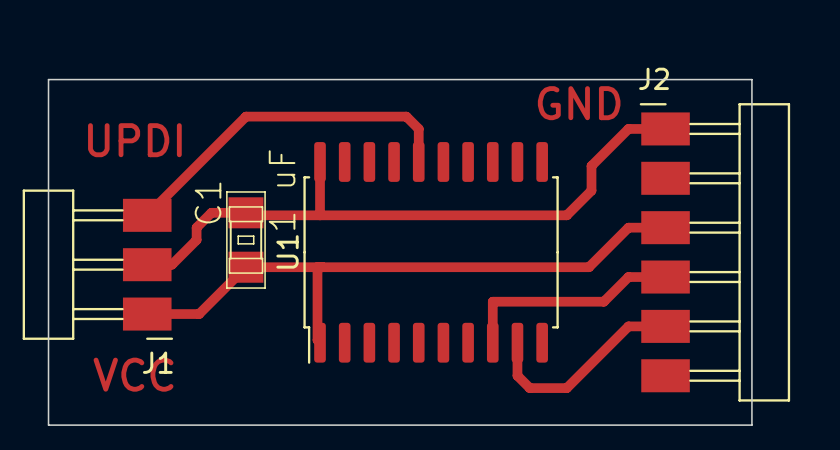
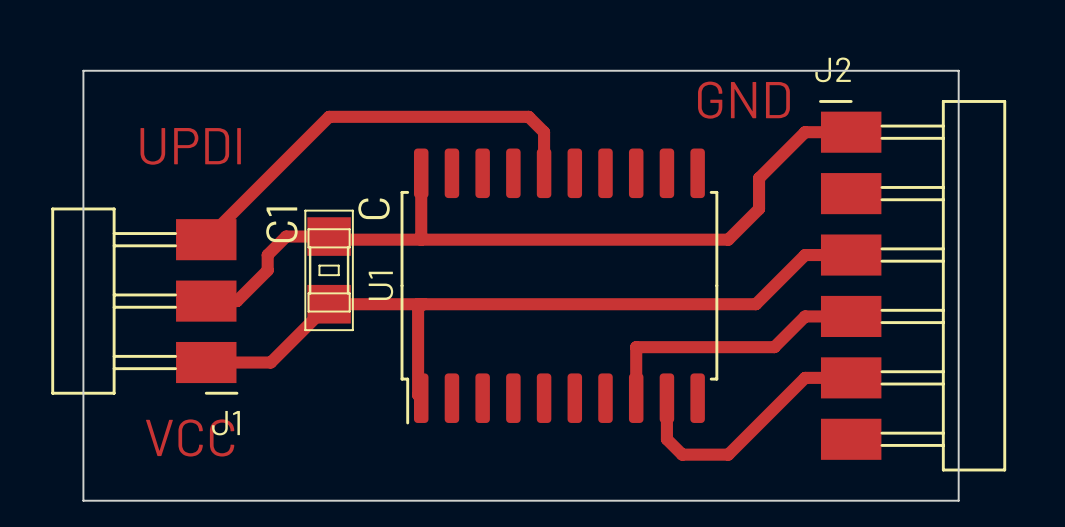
C1 value: 1 uF (282, 190) -> C (374, 208)

